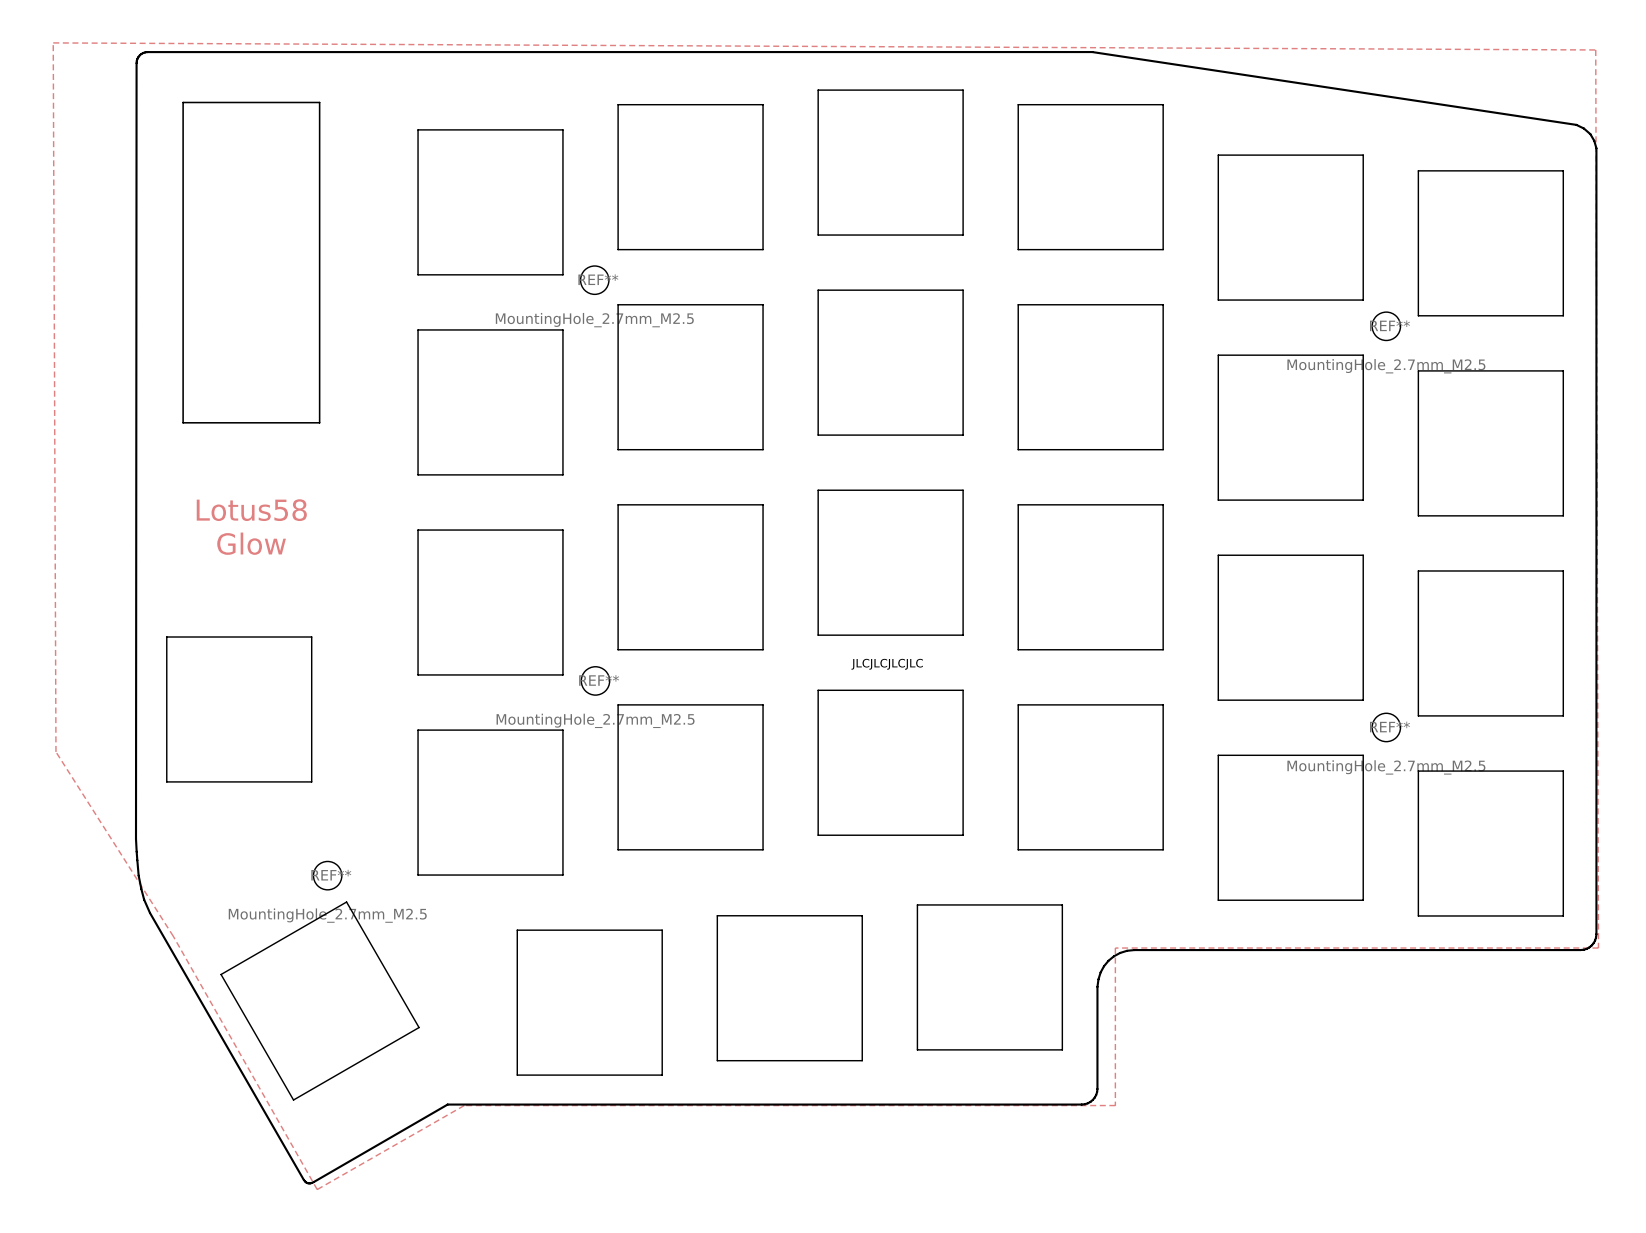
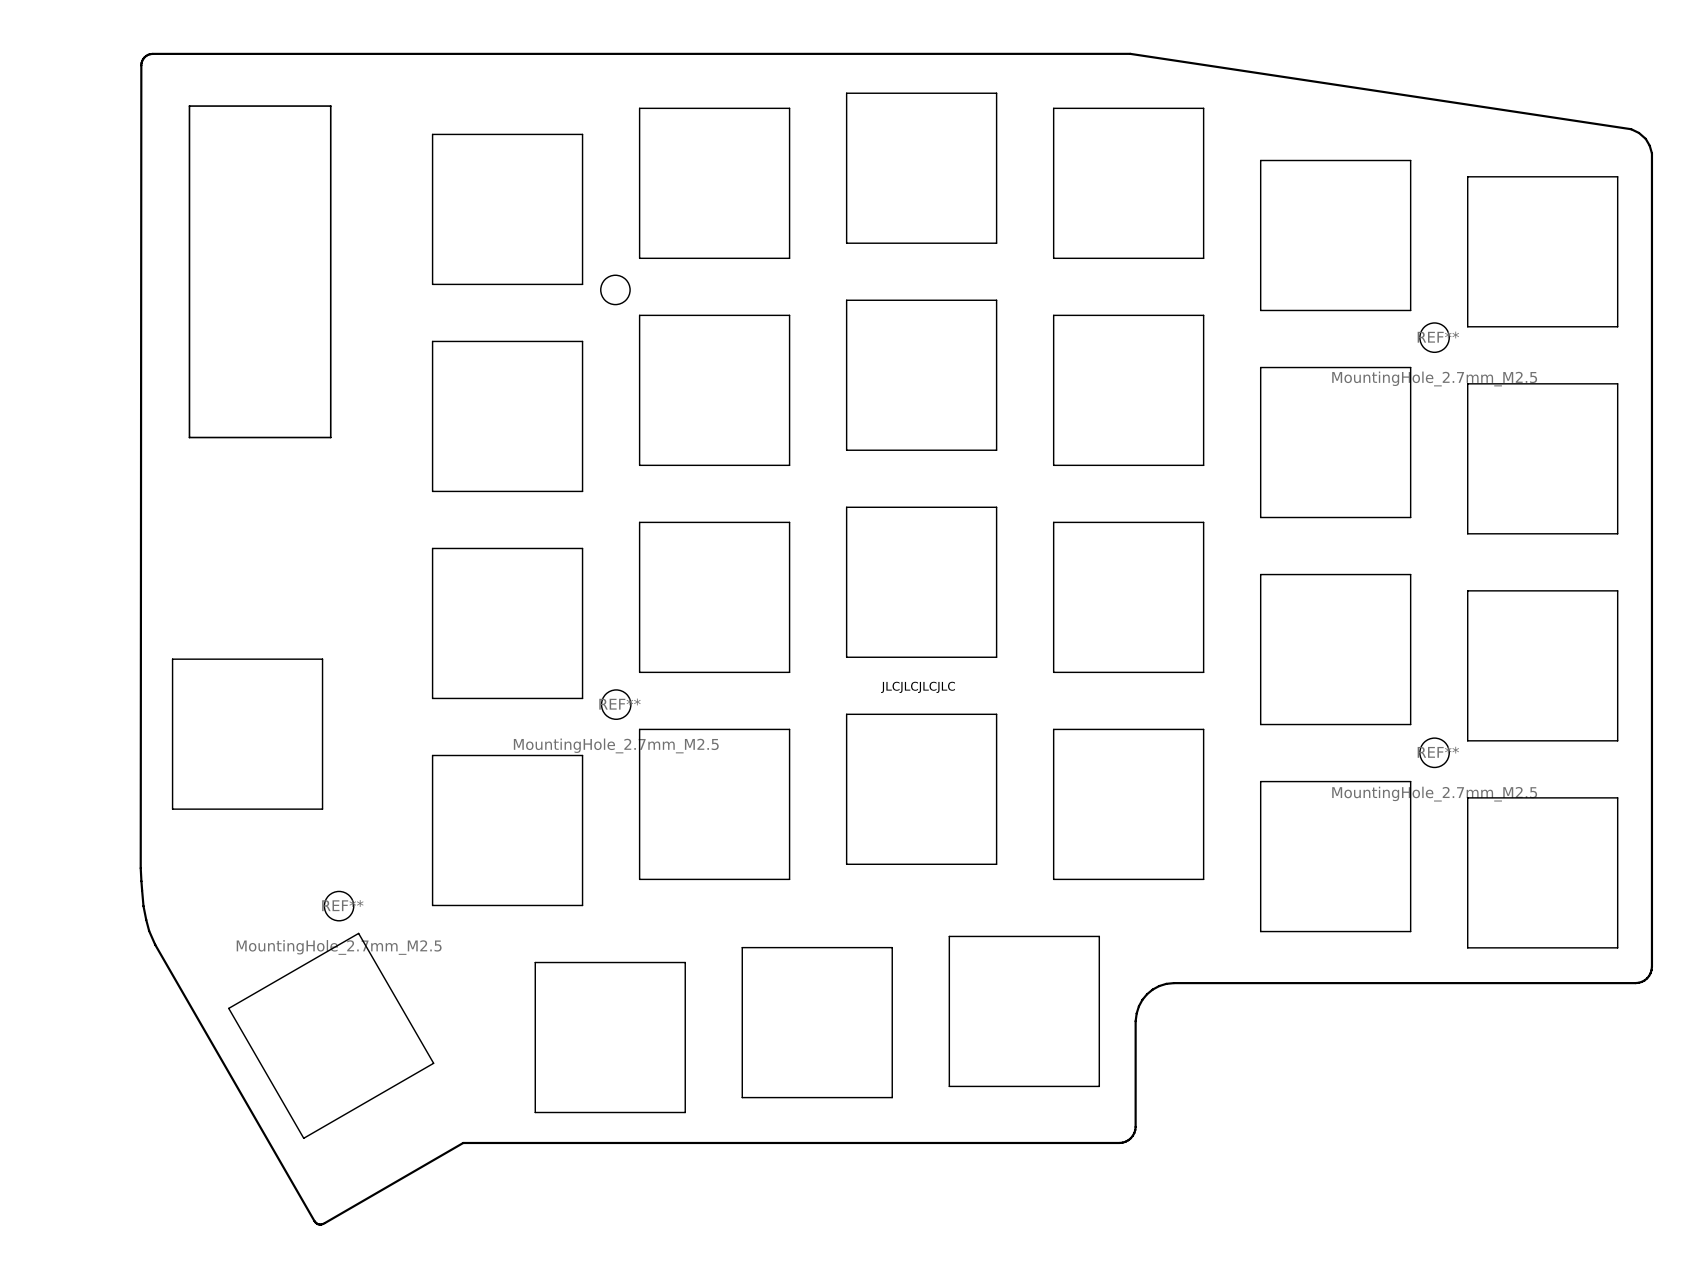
zone outline: (53, 42) (1595, 49) (1598, 948) (1115, 948) (1115, 1105) (464, 1105) (317, 1189) (173, 936) (55, 751) (53, 42) -> none
REF** name: REF** (598, 279) -> none
REF** value: MountingHole_2.7mm_M2.5 (594, 320) -> none
text: Lotus58 (251, 510) -> none
text: Glow (251, 543) -> none

